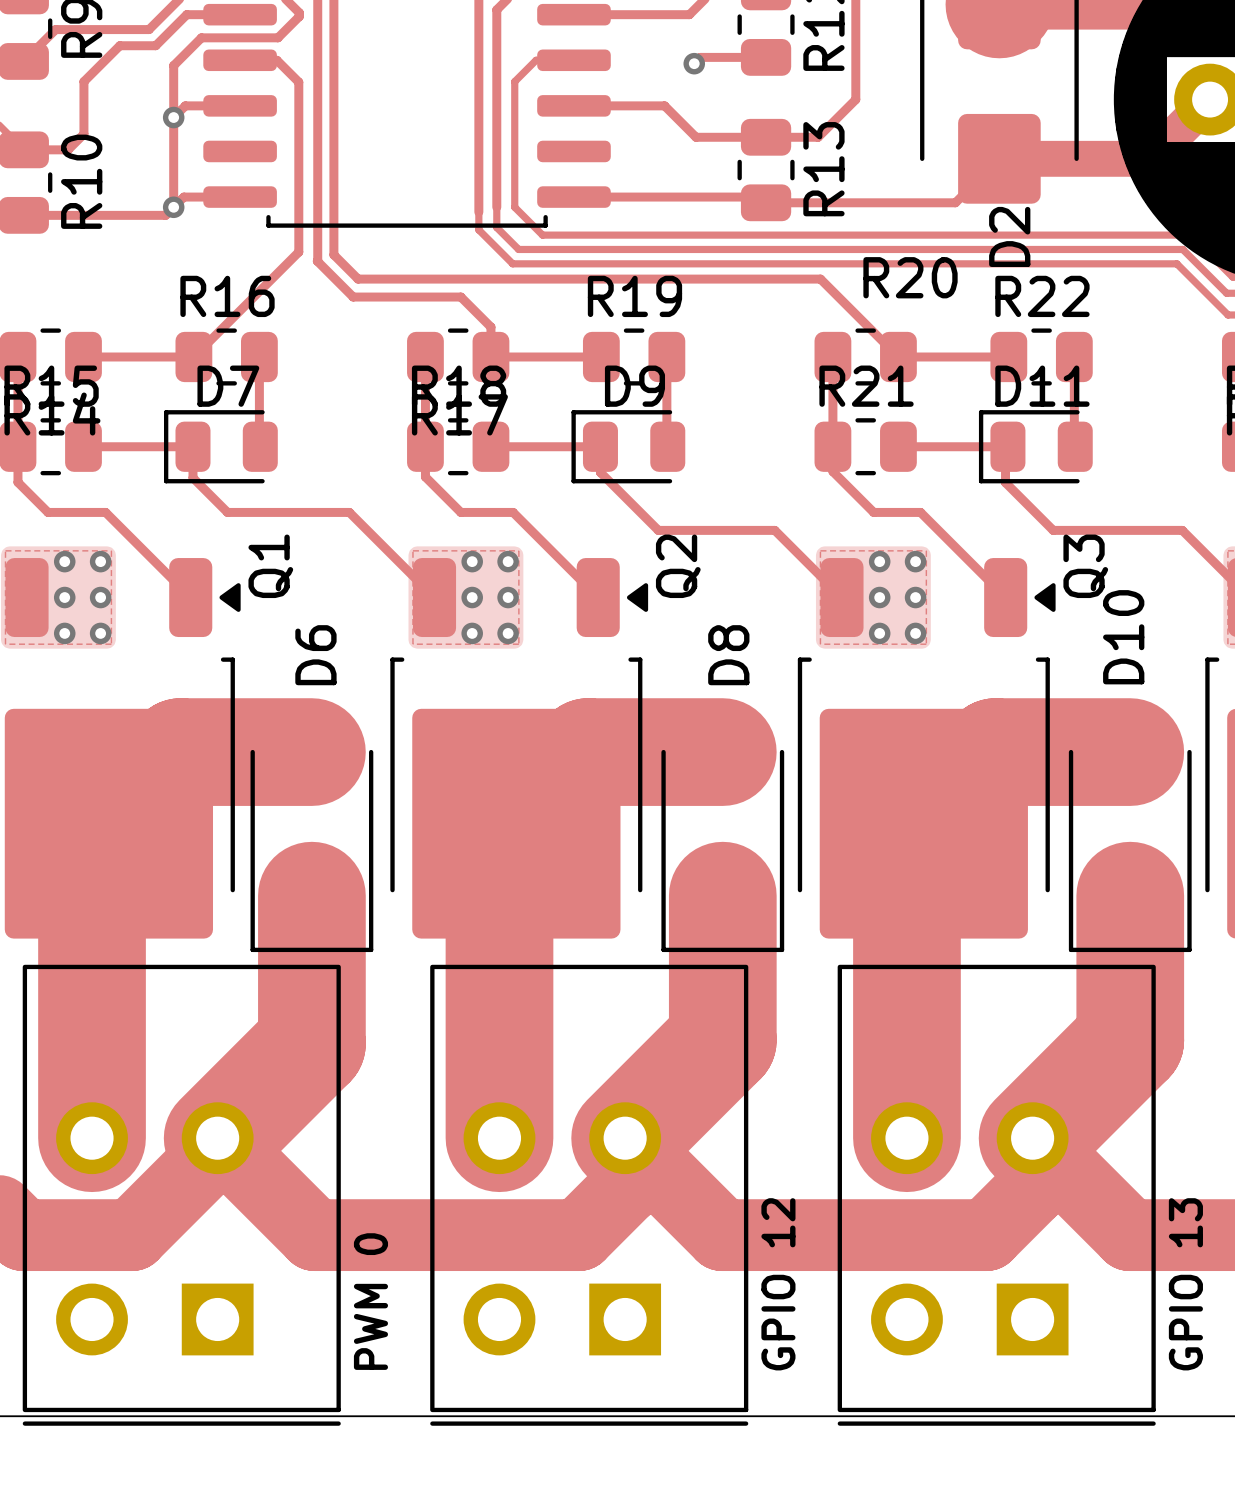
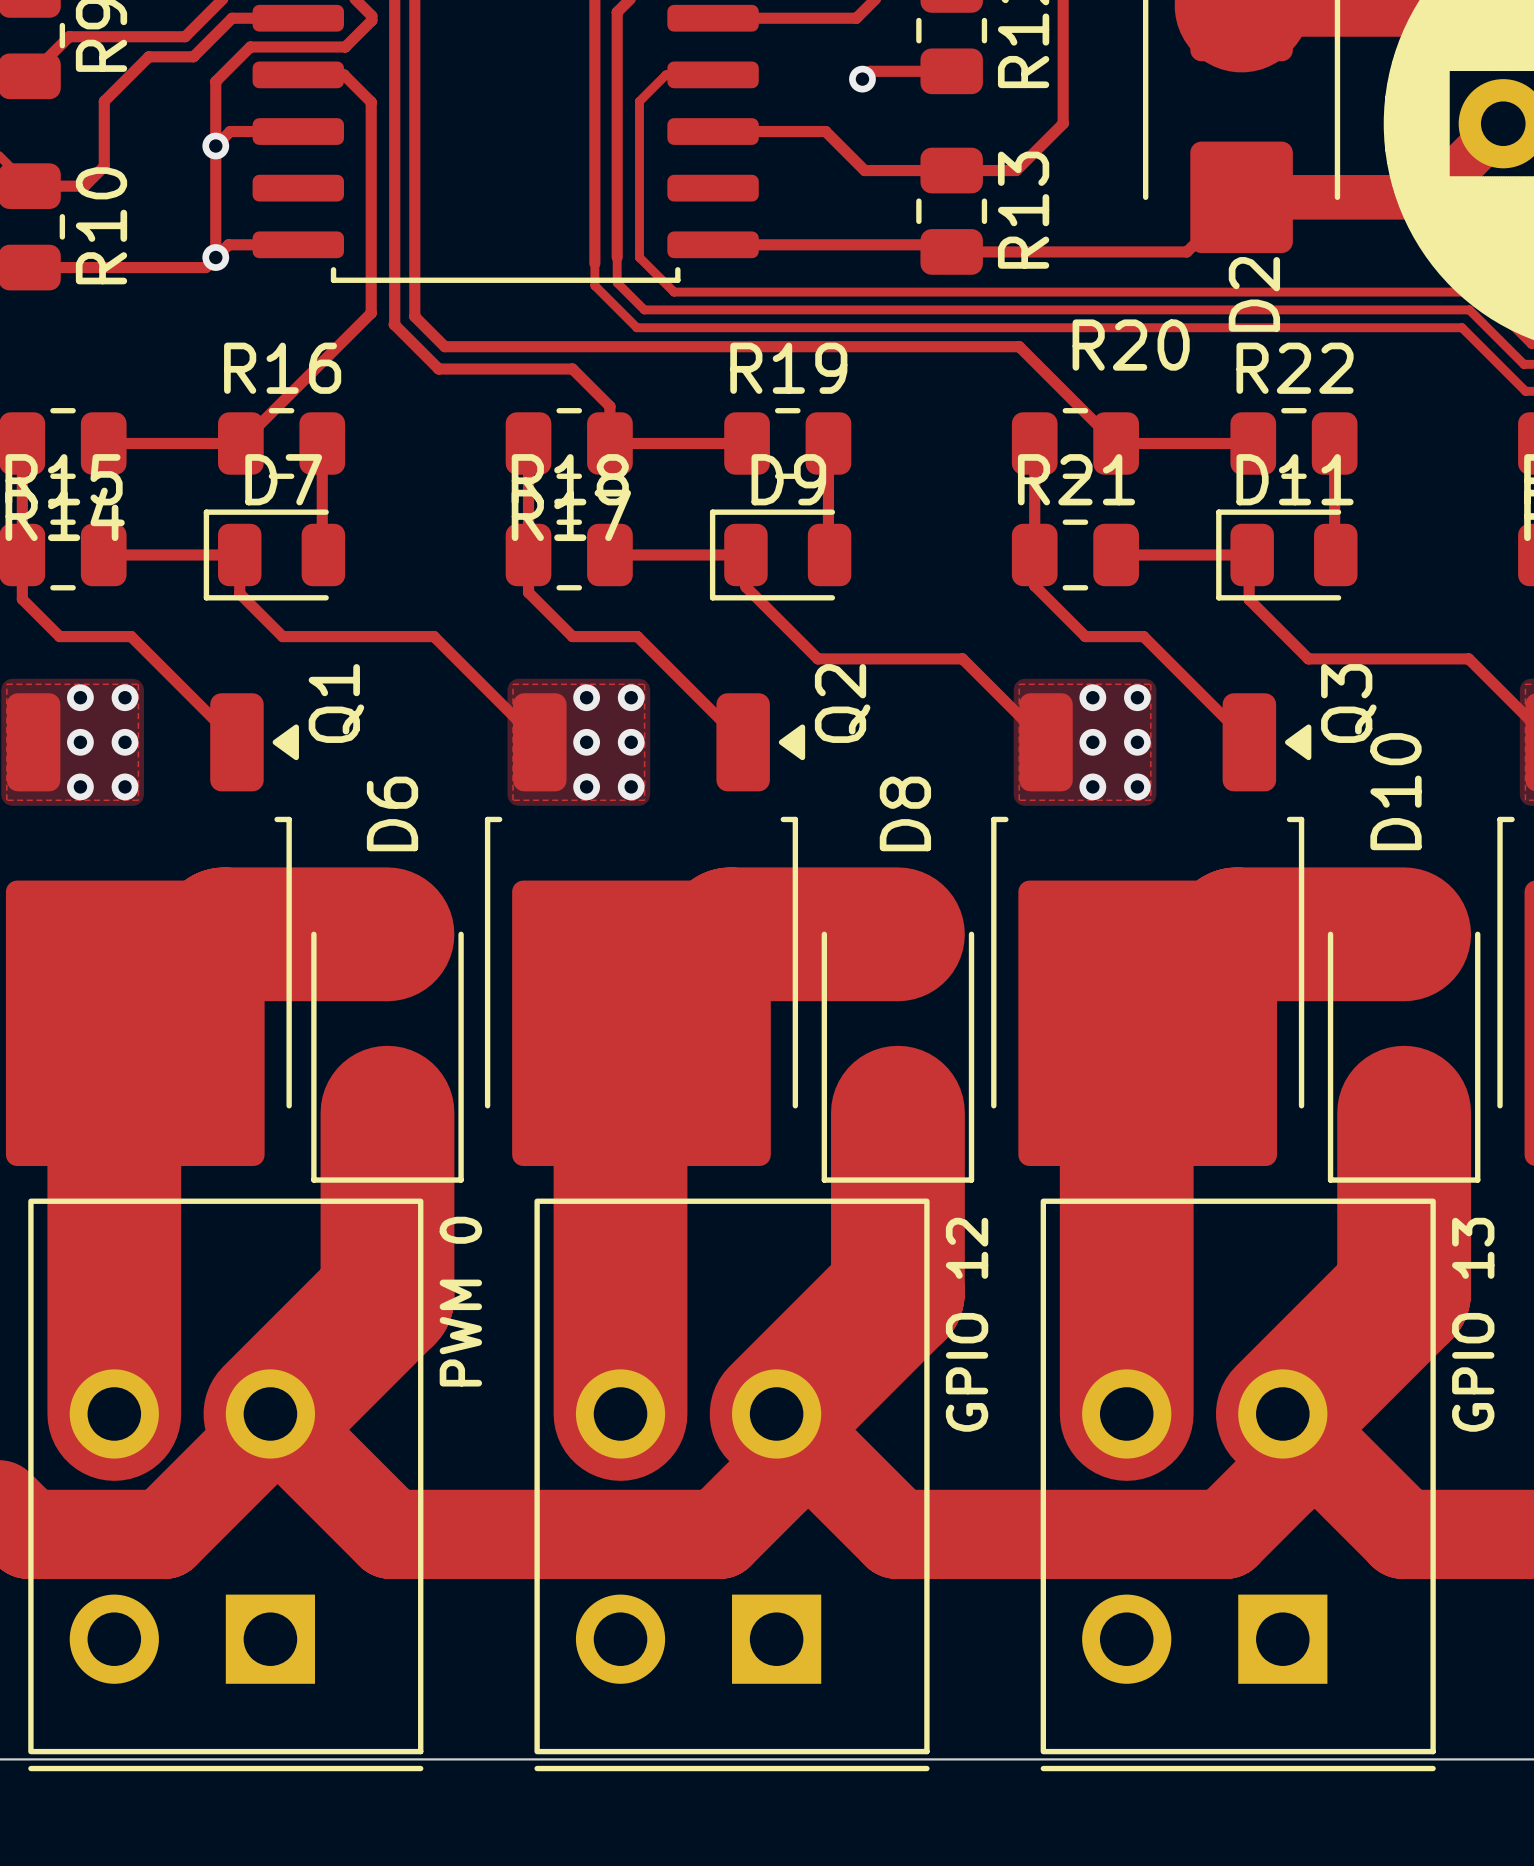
part value position: GPIO 12 (778, 1284) -> GPIO 12 (967, 1324)
part value position: GPIO 13 (1185, 1284) -> GPIO 13 (1473, 1324)
part value position: PWM 0 (370, 1301) -> PWM 0 (460, 1301)

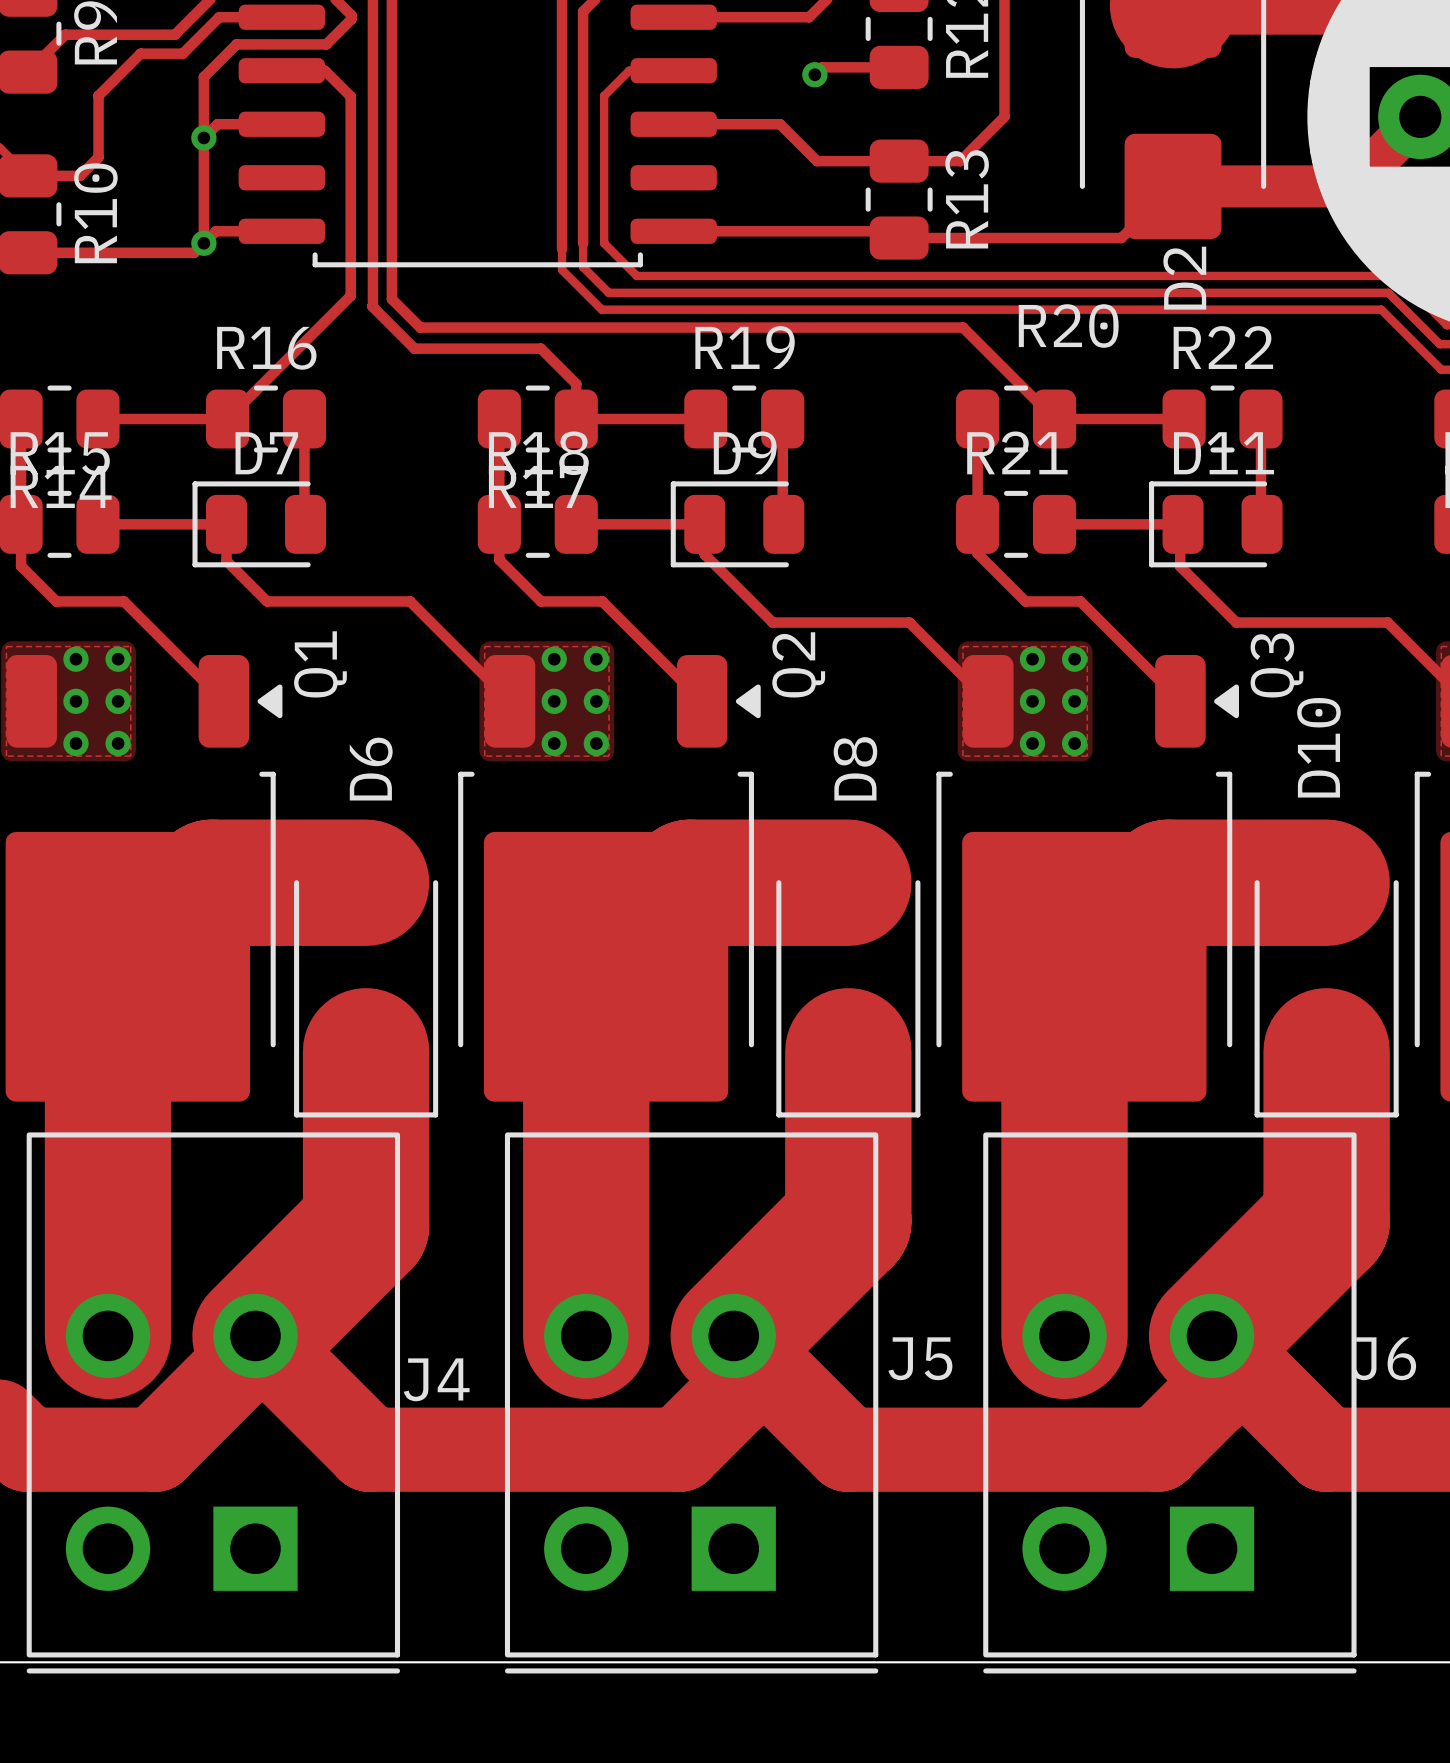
J4 value: PWM 0 (460, 1301) -> none
J5 value: GPIO 12 (967, 1324) -> none
J6 value: GPIO 13 (1473, 1324) -> none
J5 name: none -> J5 (920, 1358)
J6 name: none -> J6 (1384, 1358)
J4 name: none -> J4 (436, 1379)

